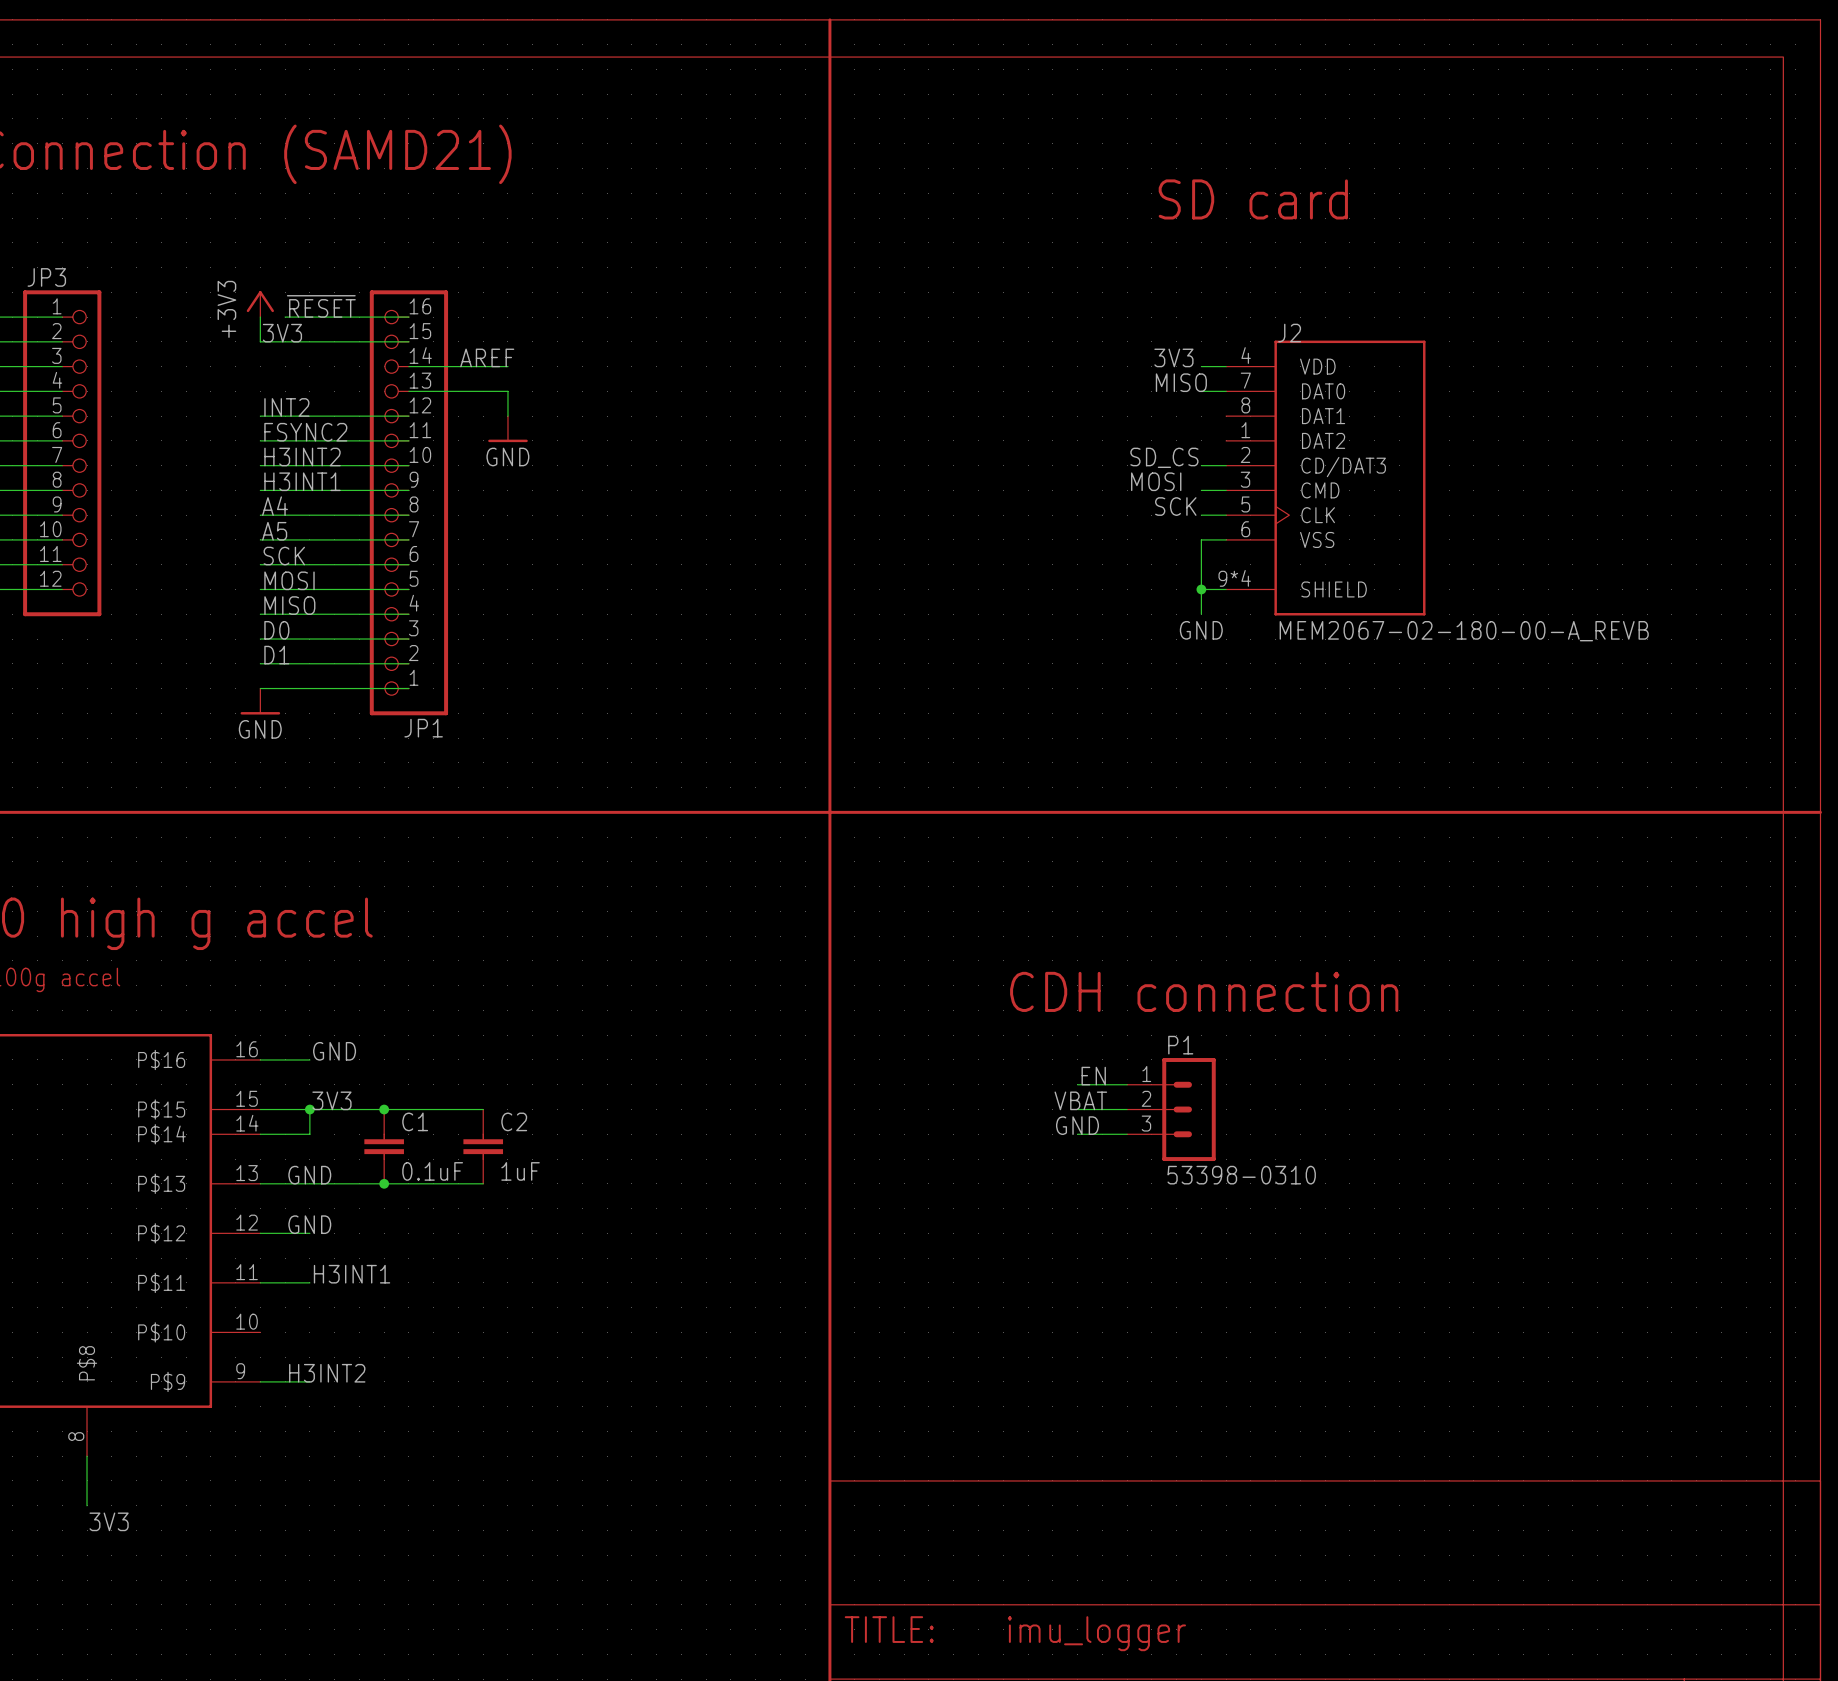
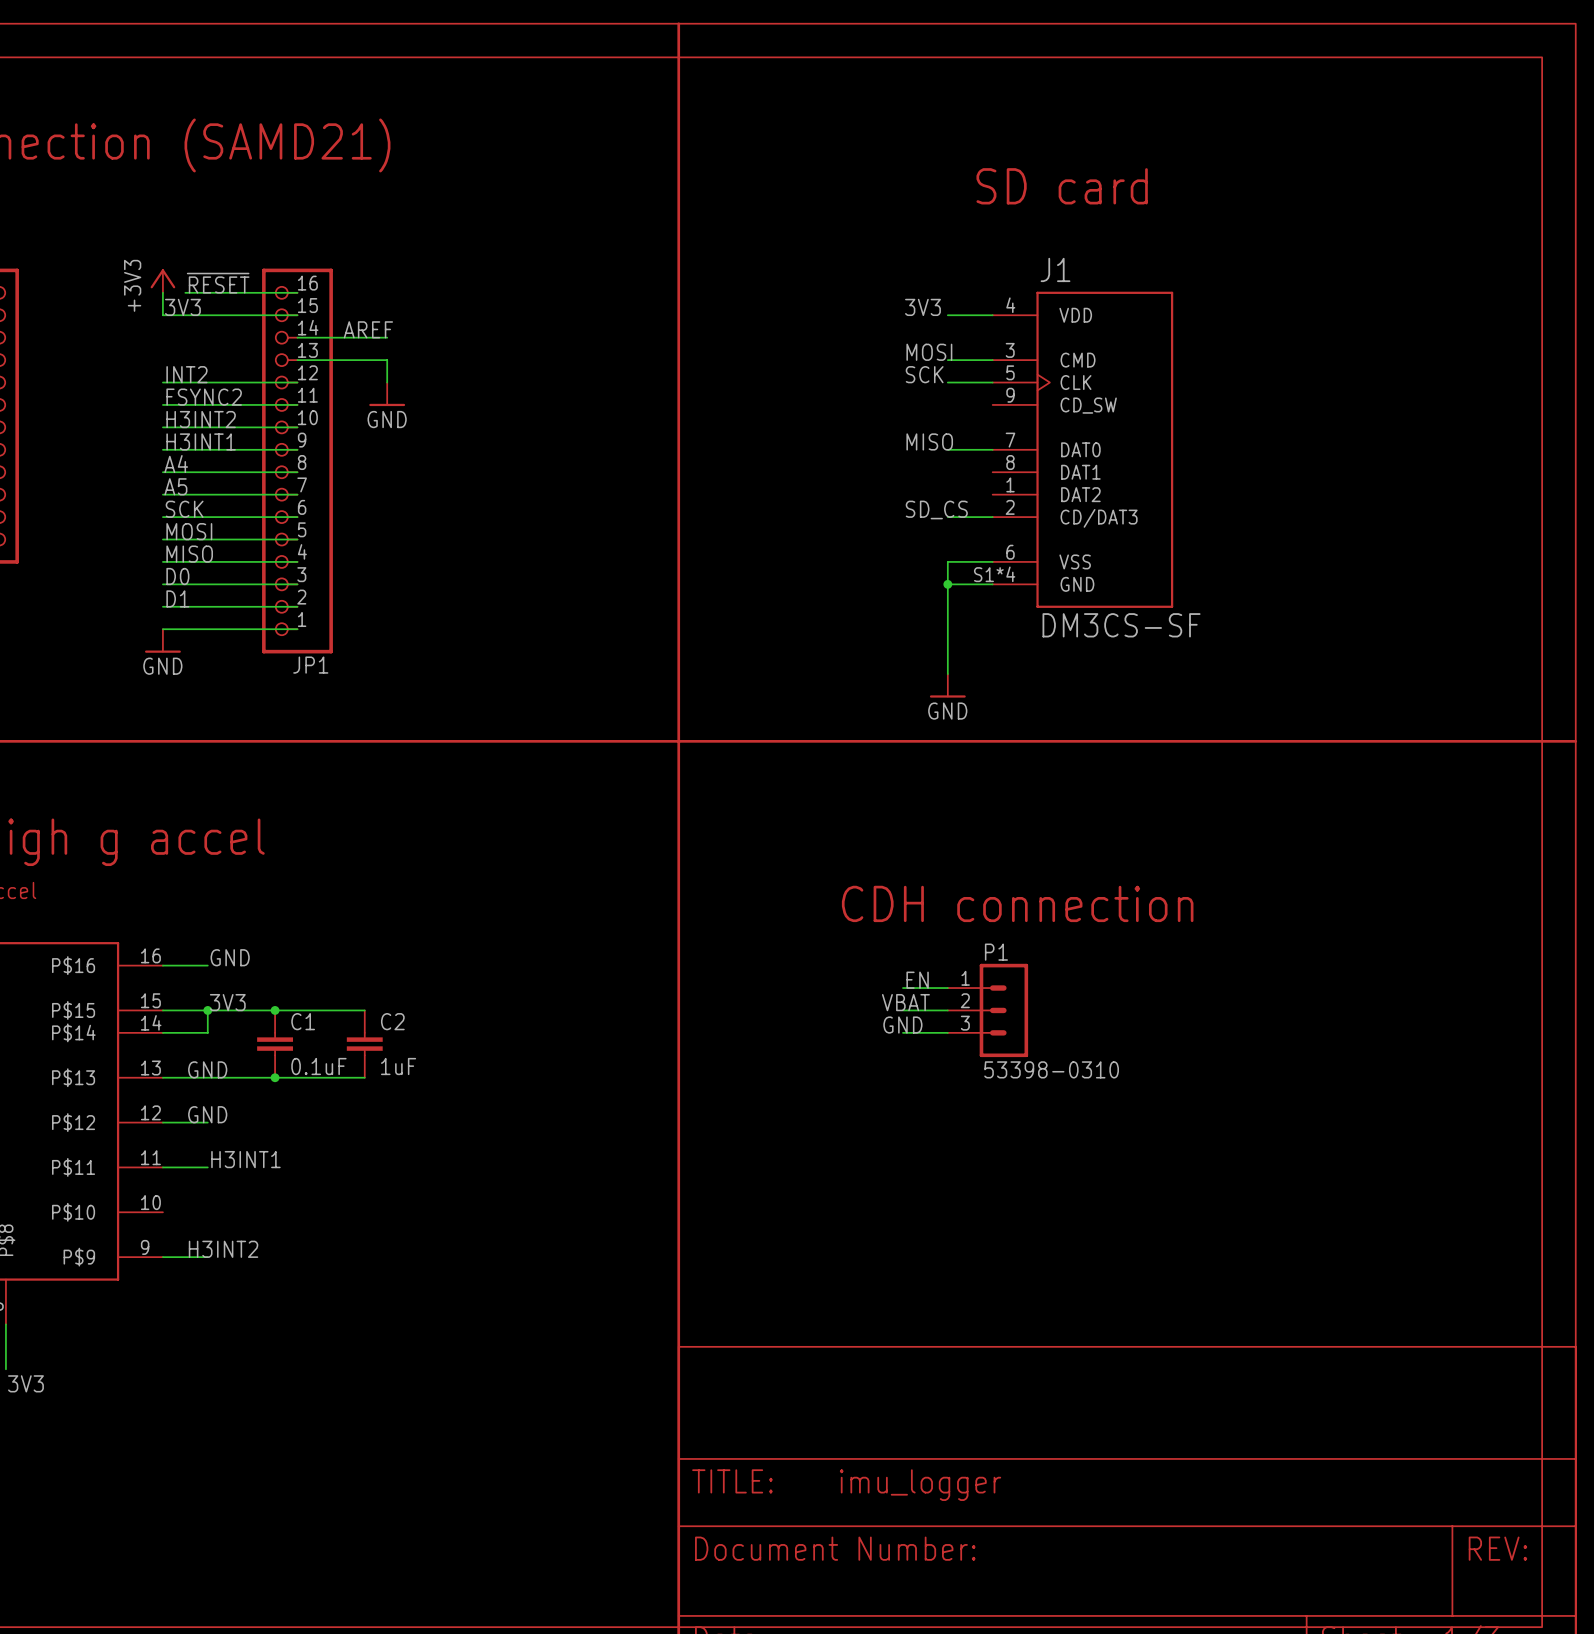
wire: none -> (947, 315) (992, 315)
label position: 3V3 (1173, 357) -> 3V3 (922, 307)
wire: (1201, 366) (1226, 366) -> none
label position: MISO (1181, 382) -> MISO (929, 441)
wire: none -> (947, 360) (992, 360)
wire: none -> (947, 382) (992, 382)
label position: SD_CS (1164, 457) -> SD_CS (936, 509)
wire: (1201, 465) (1226, 465) -> none
J2: MEM2067-02-180-00-A_REVB (1325, 478) -> none
label position: MOSI (1156, 481) -> MOSI (929, 352)
wire: none -> (947, 449) (992, 449)
J1: none -> DM3CS-SF (1082, 449)
label position: SCK (1175, 506) -> SCK (924, 374)
wire: (1226, 539) (1201, 539) (1201, 614) -> none
wire: none -> (947, 517) (992, 517)
wire: (1201, 589) (1226, 589) -> none
junction: (1201, 589) -> none
wire: none -> (992, 561) (947, 561) (947, 674)
label: GND (1201, 630) -> none
wire: none -> (947, 584) (992, 584)
junction: none -> (947, 584)
power symbol: none -> GND (947, 685)

